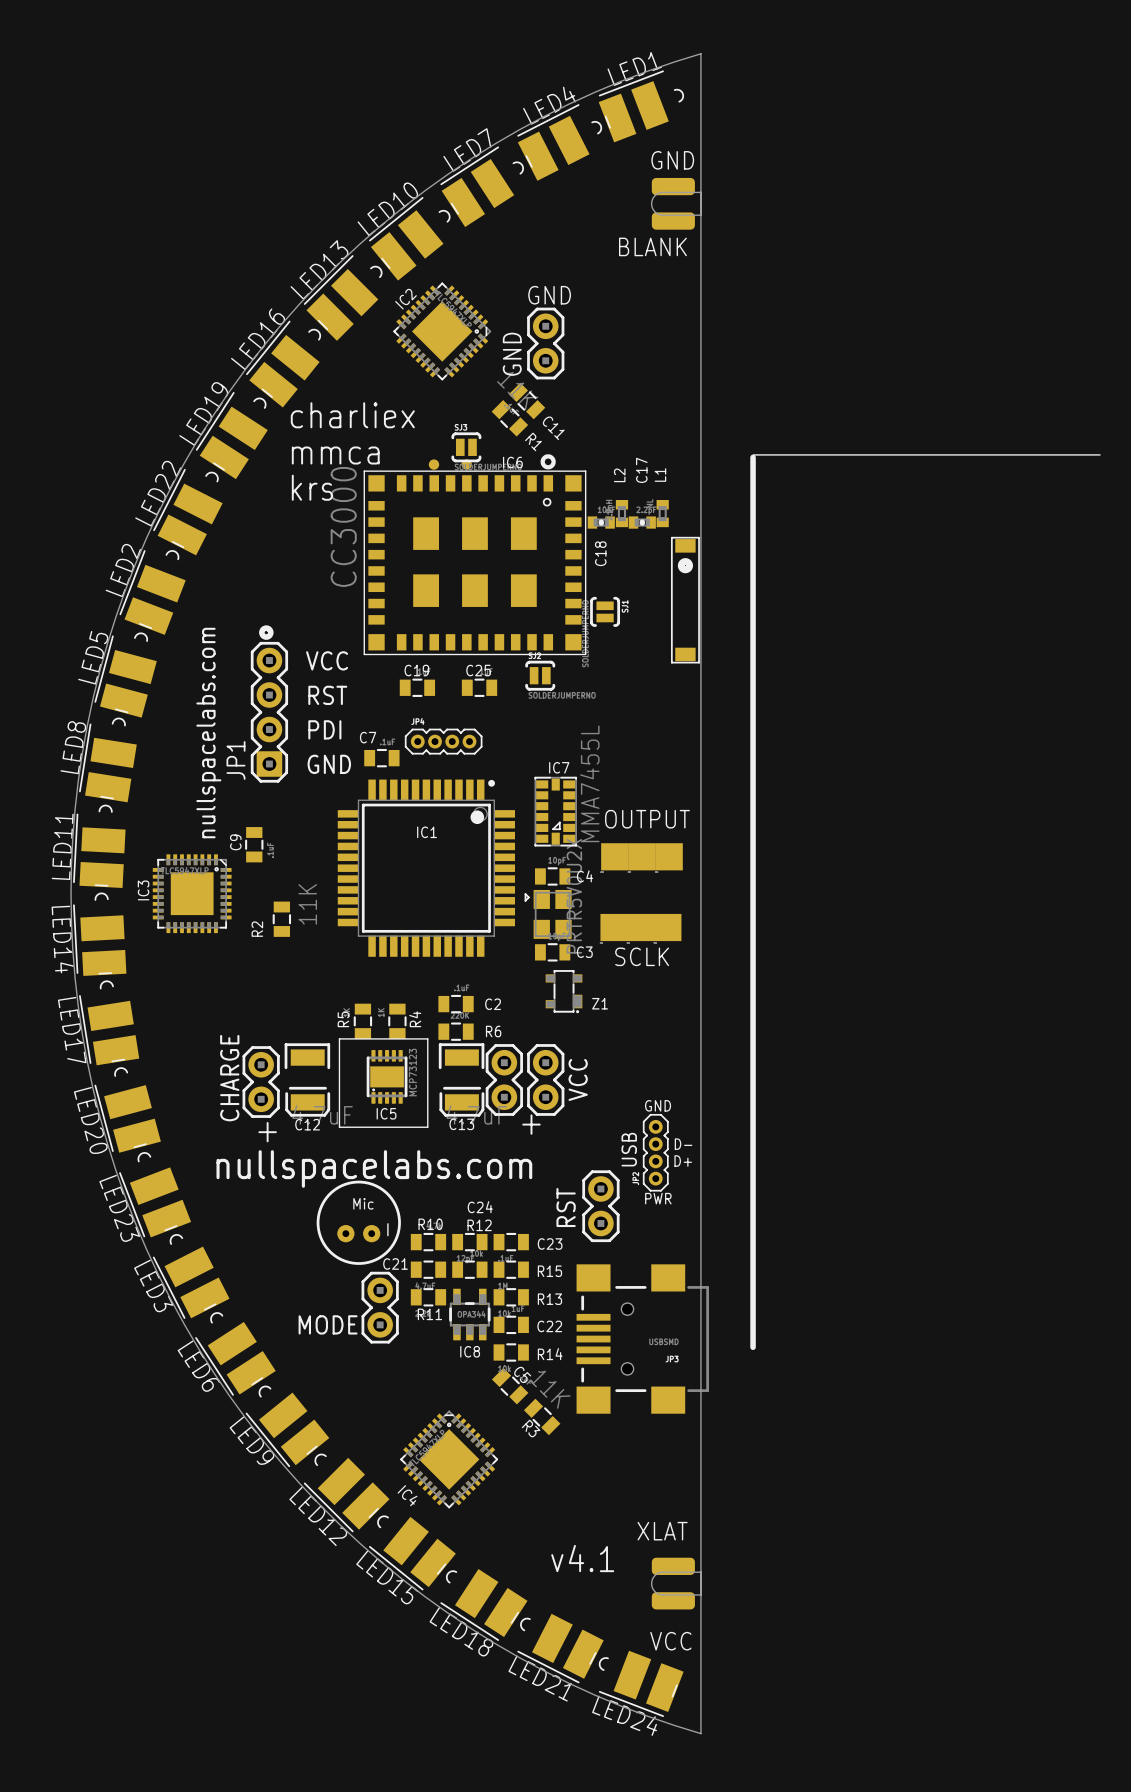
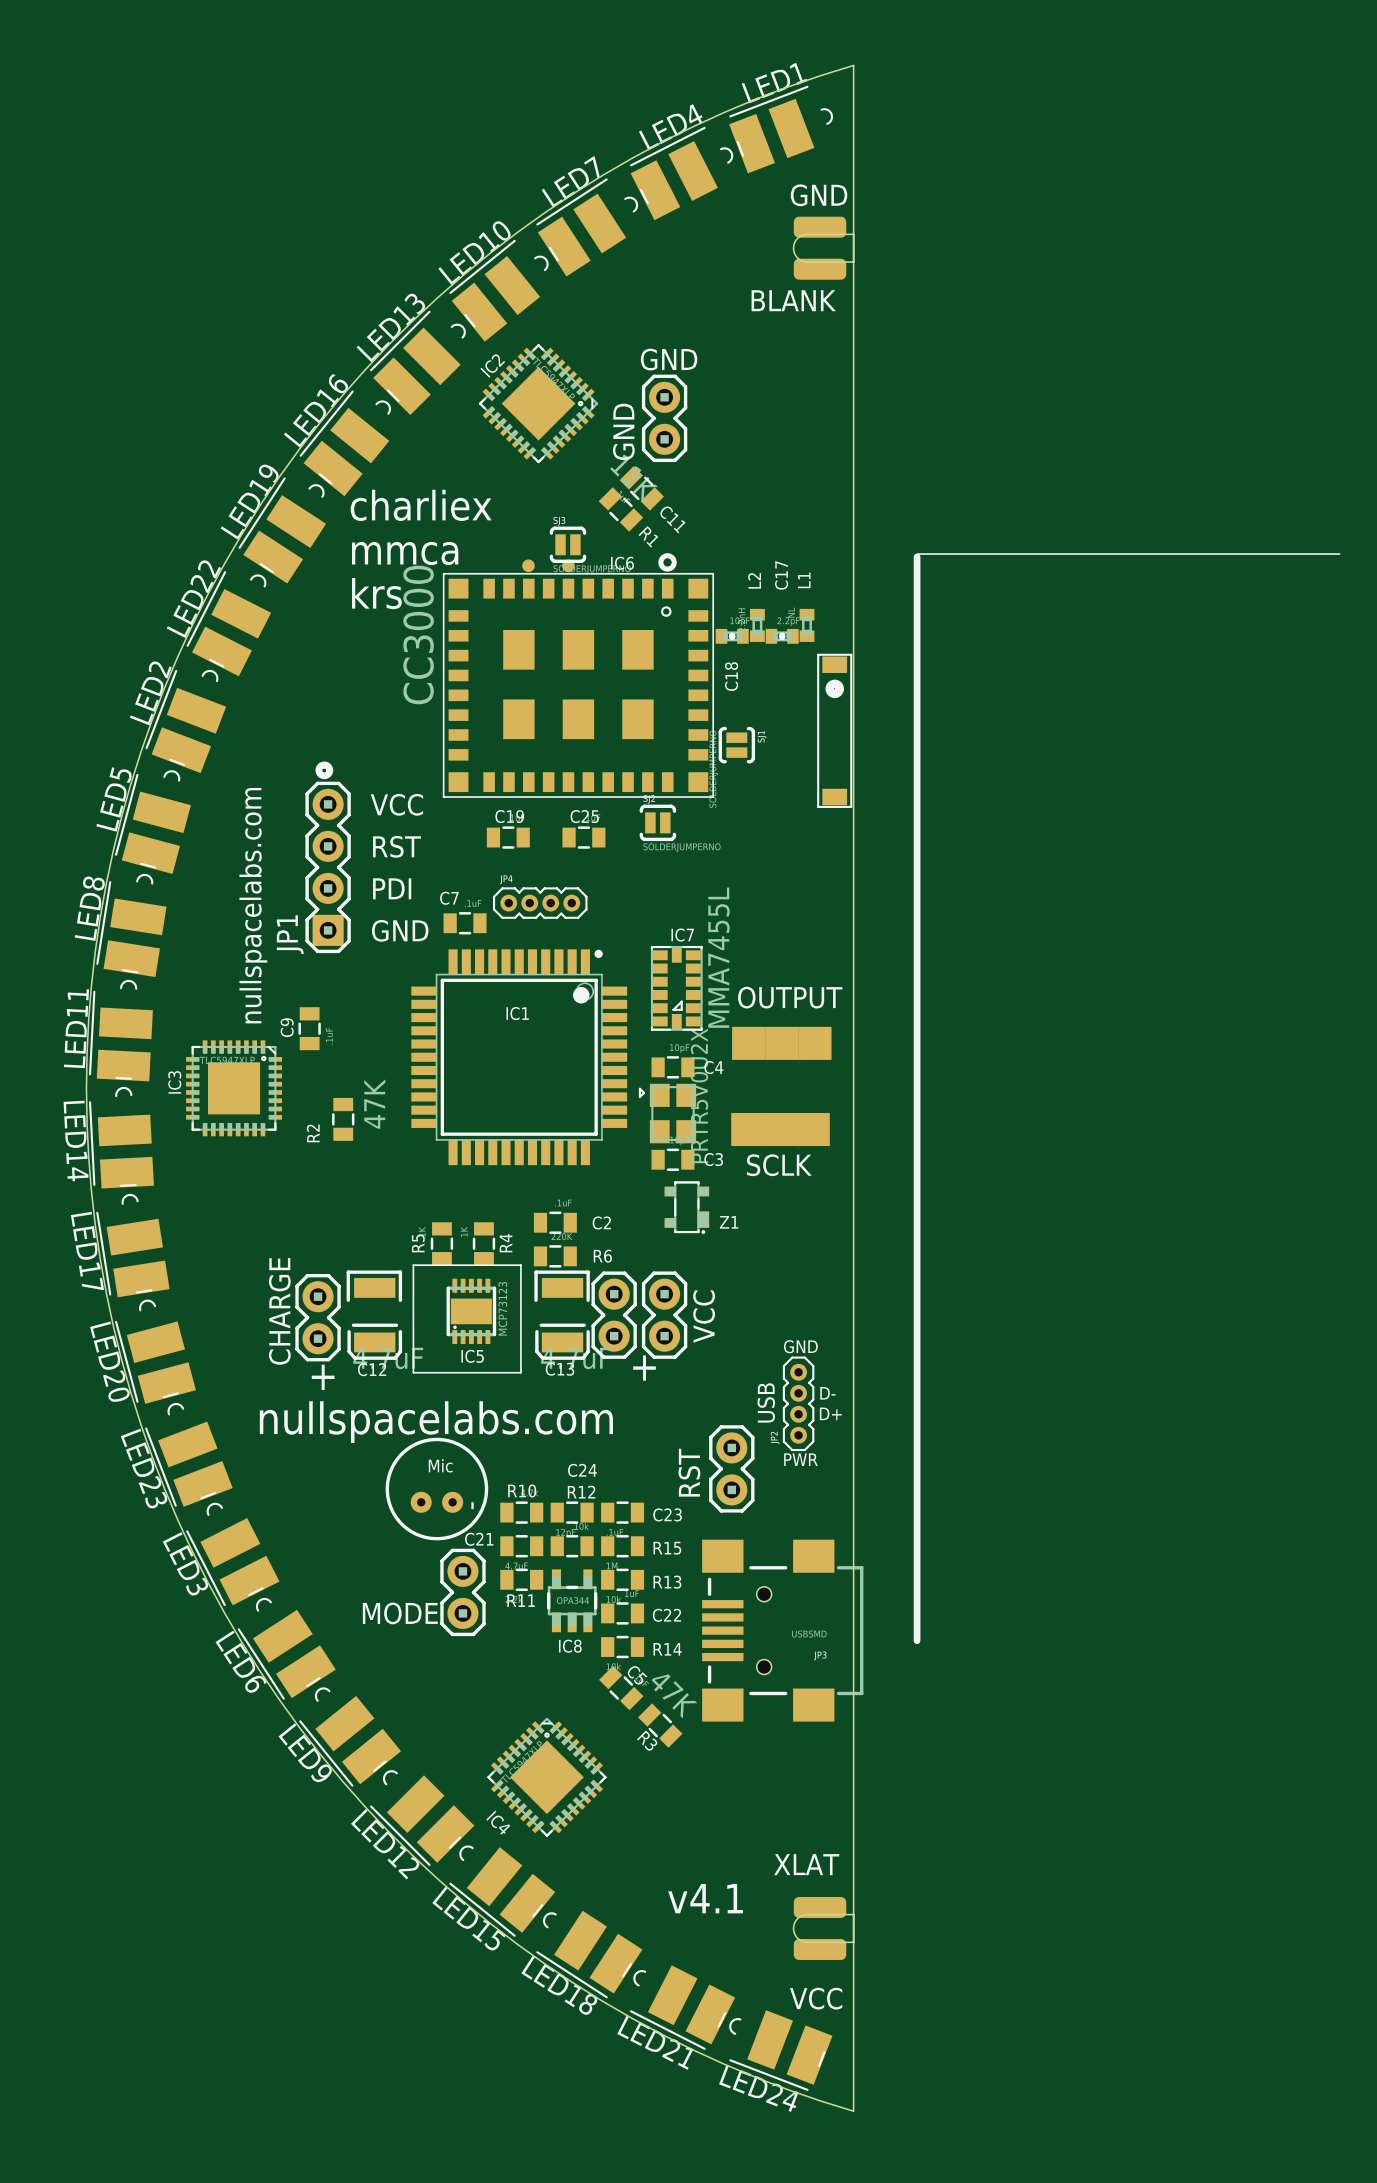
R2 value: 11K (307, 904) -> 47K (374, 1104)
R3 value: 11K (549, 1389) -> 47K (674, 1696)

